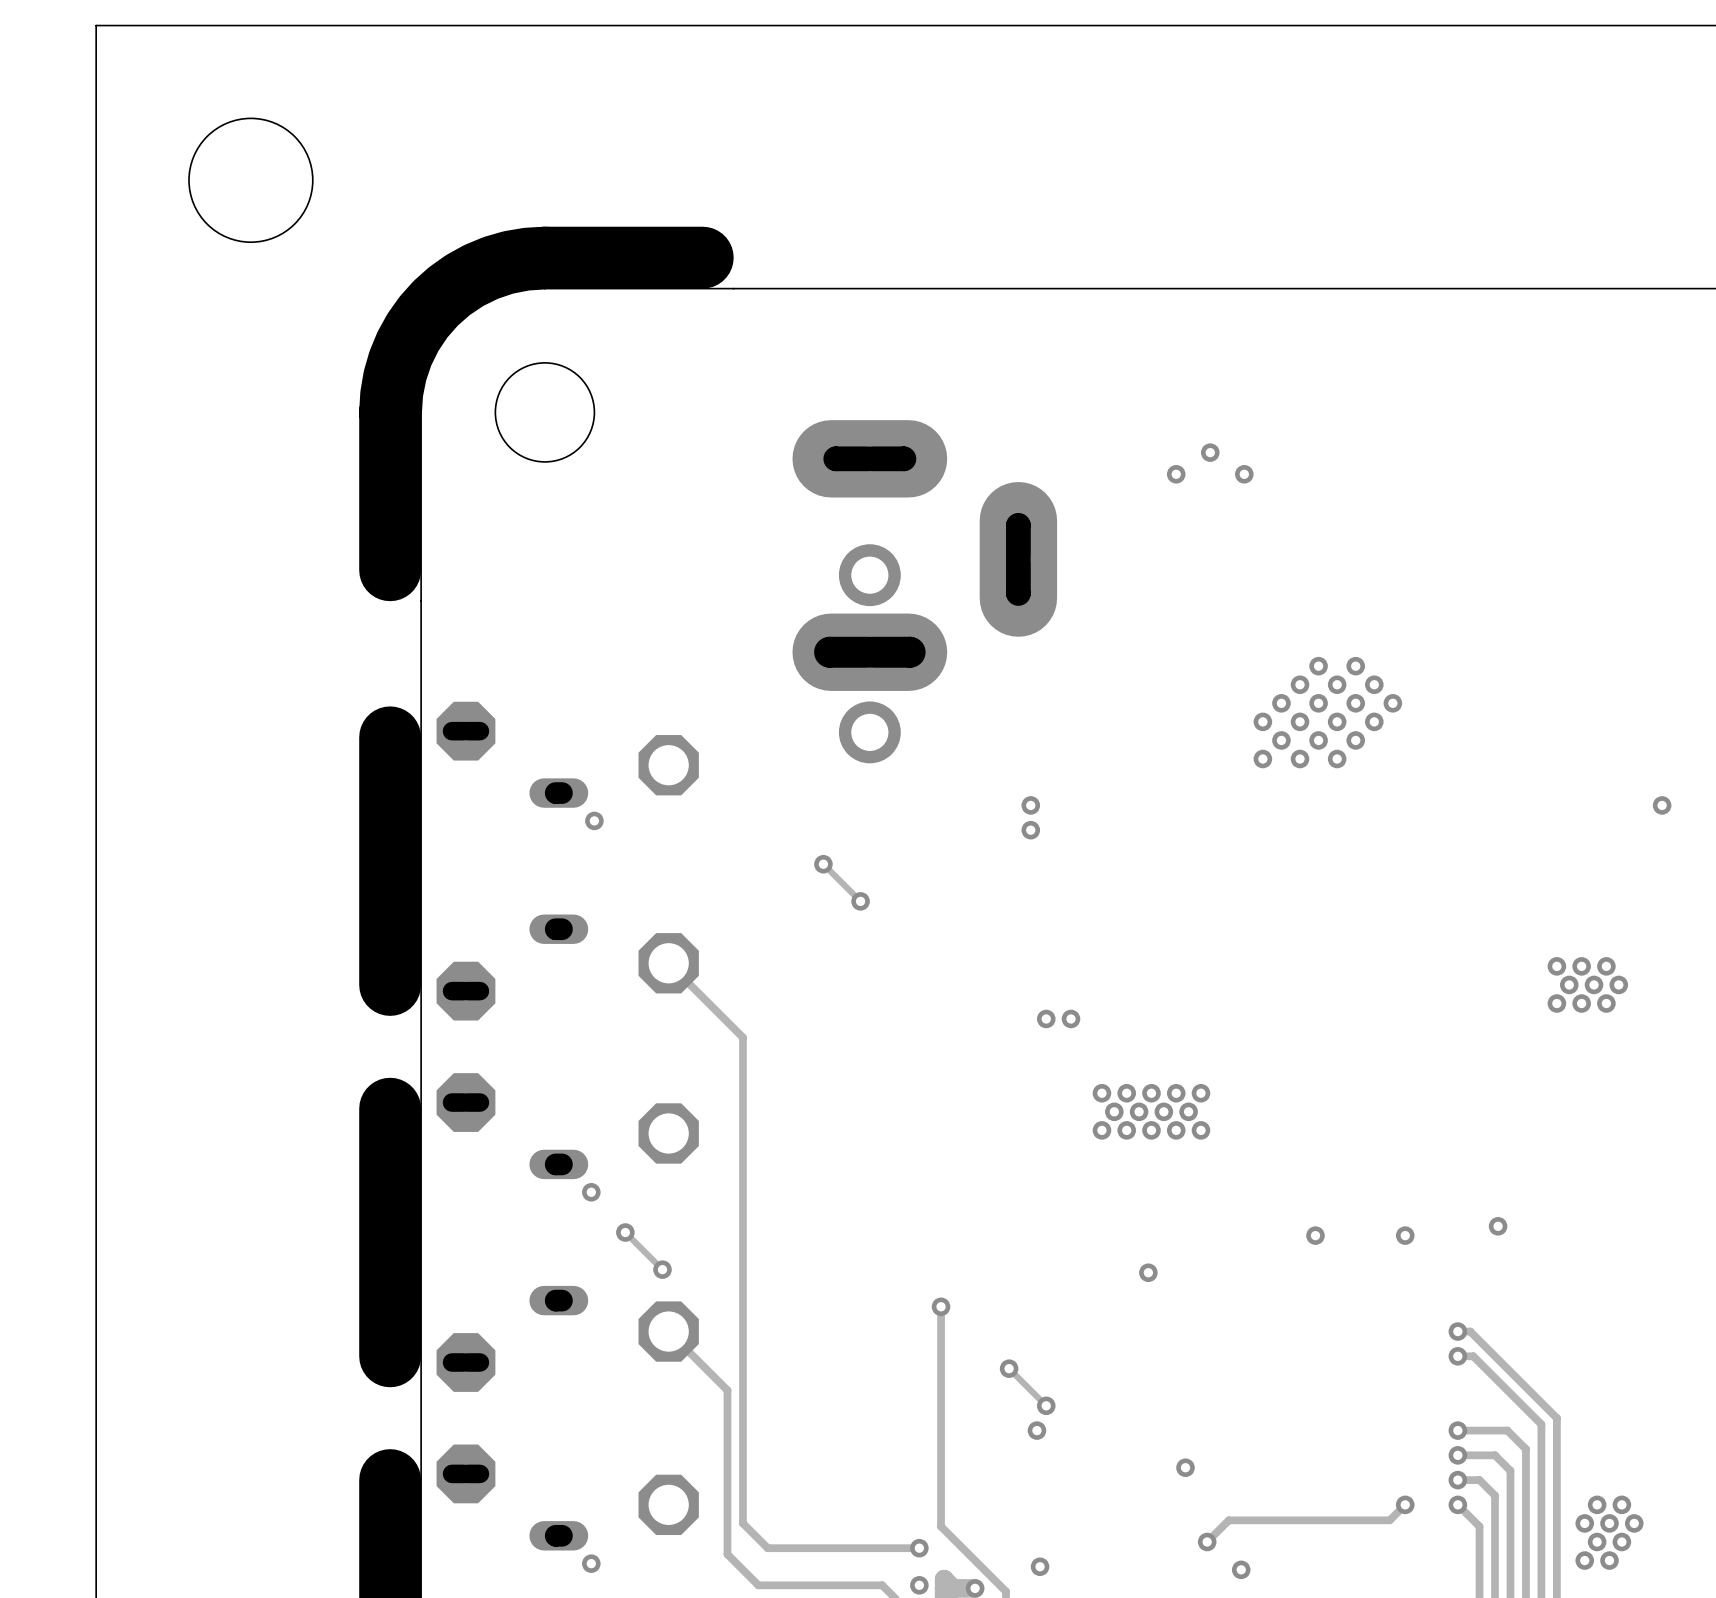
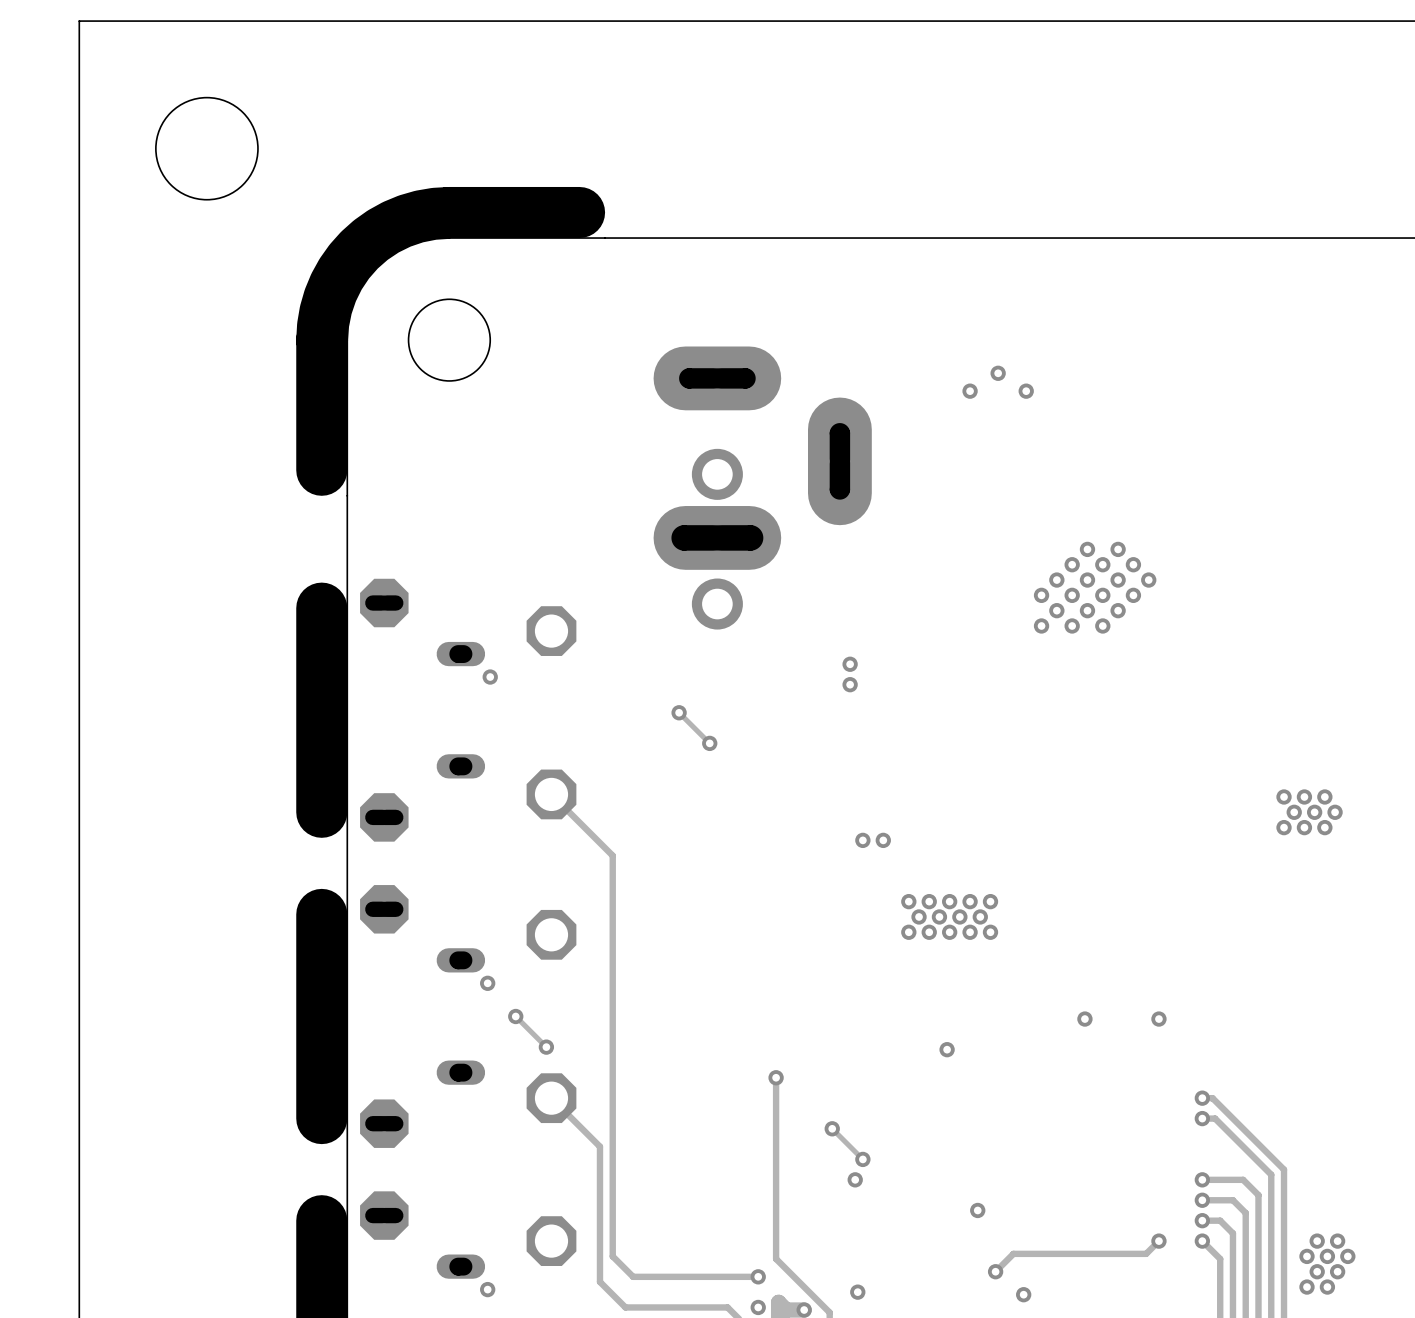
via: (1662, 805) -> none
via: (1498, 1226) -> none

